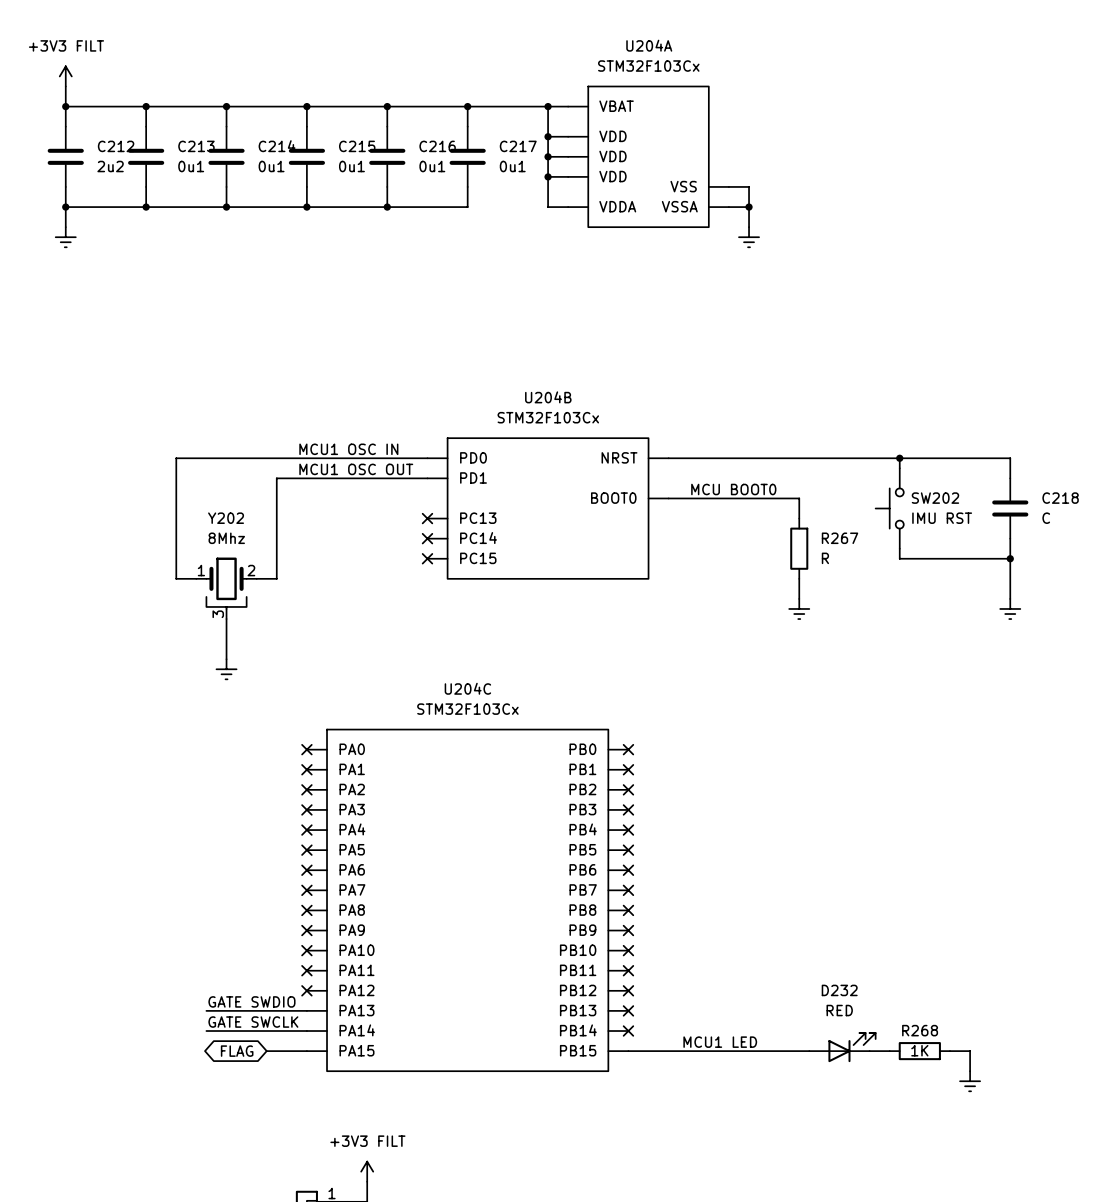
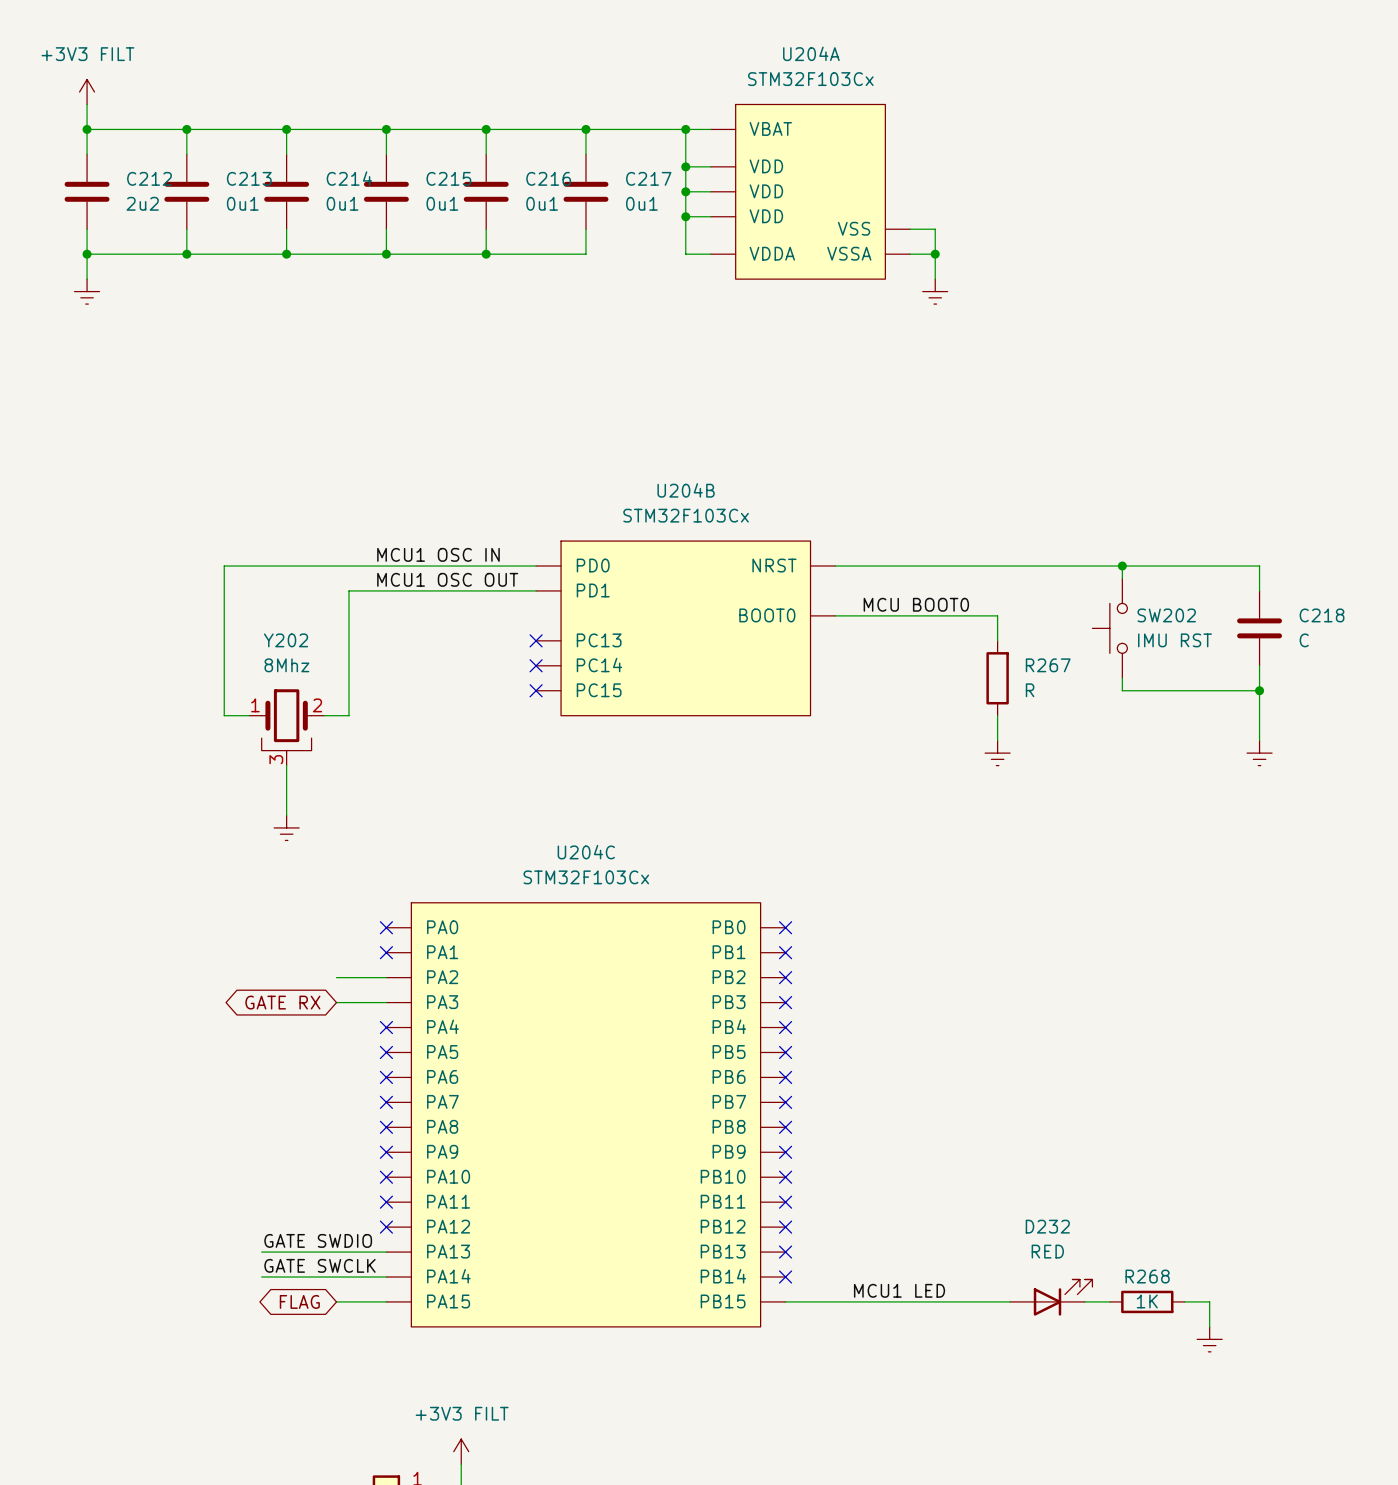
wire: none -> (336, 977) (386, 977)
no-connect mark: (306, 789) -> none
global label: none -> GATE RX (282, 1002)
wire: none -> (336, 1002) (386, 1002)
no-connect mark: (306, 809) -> none

